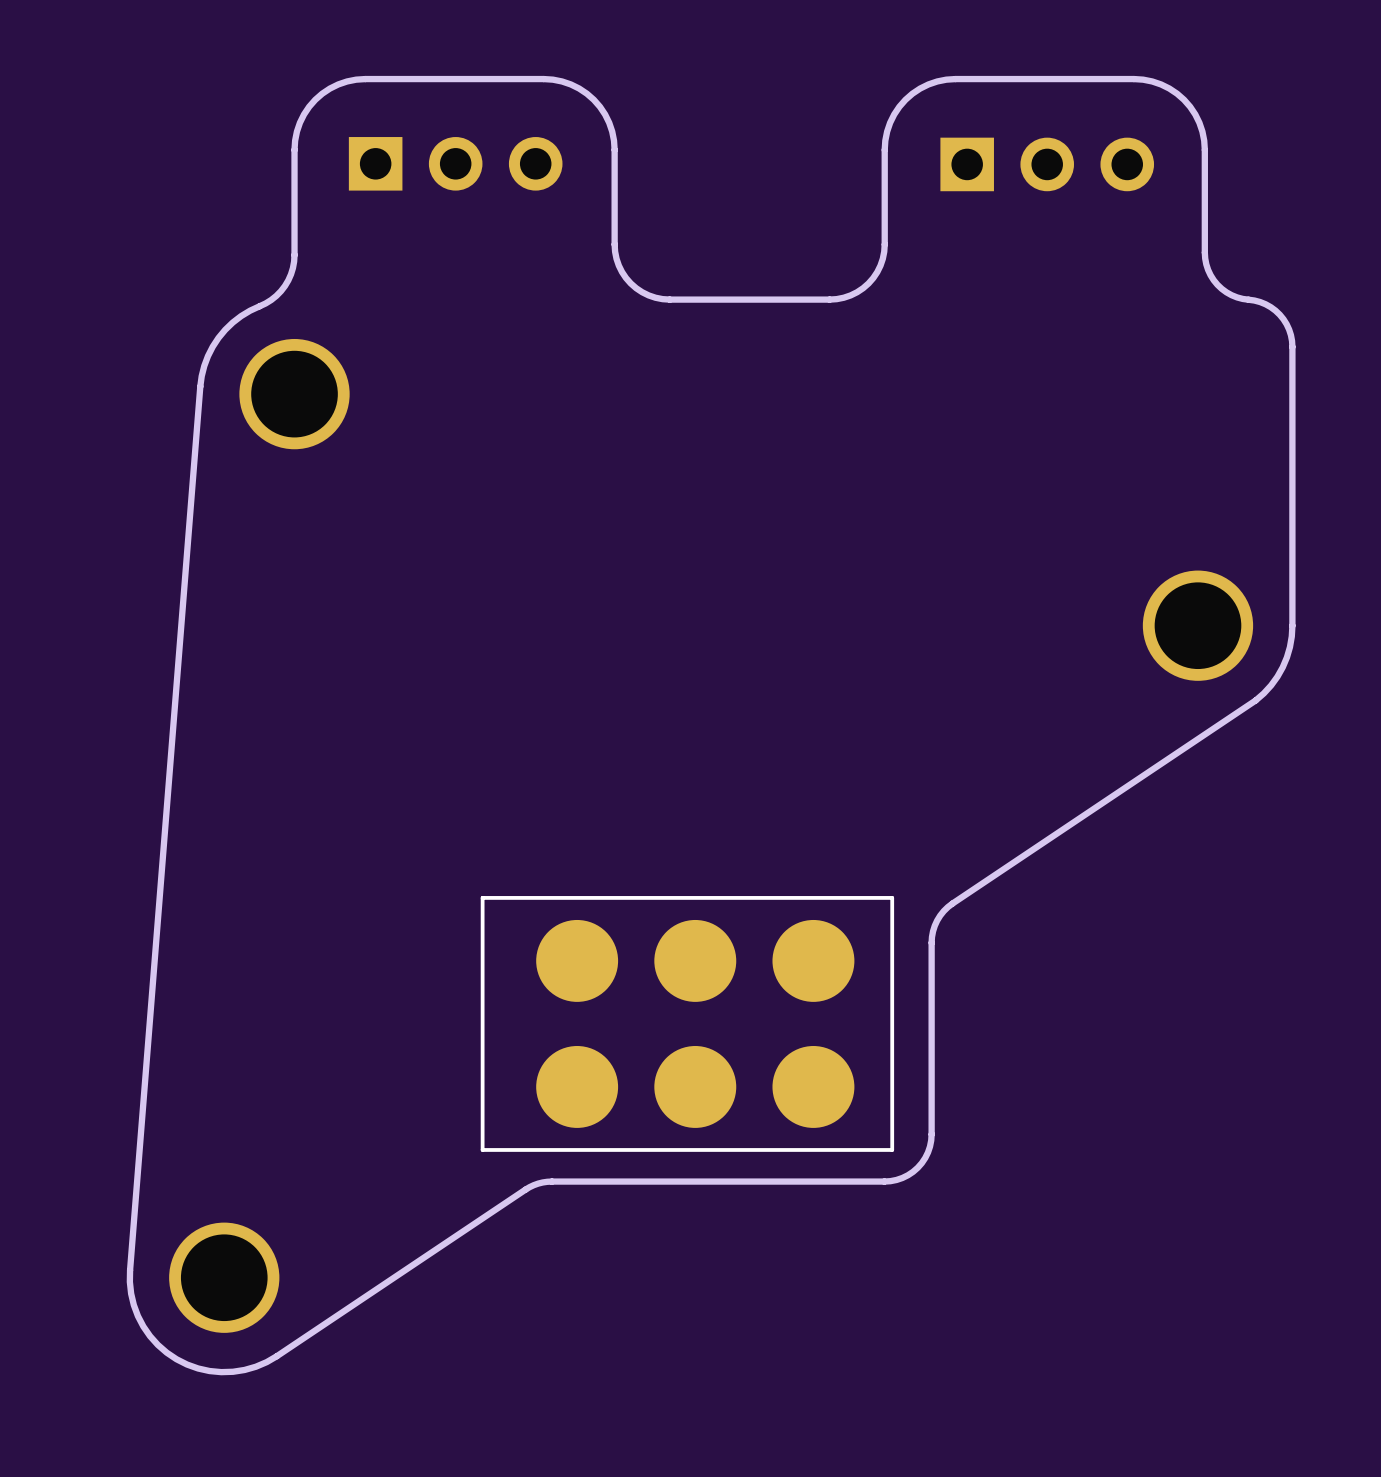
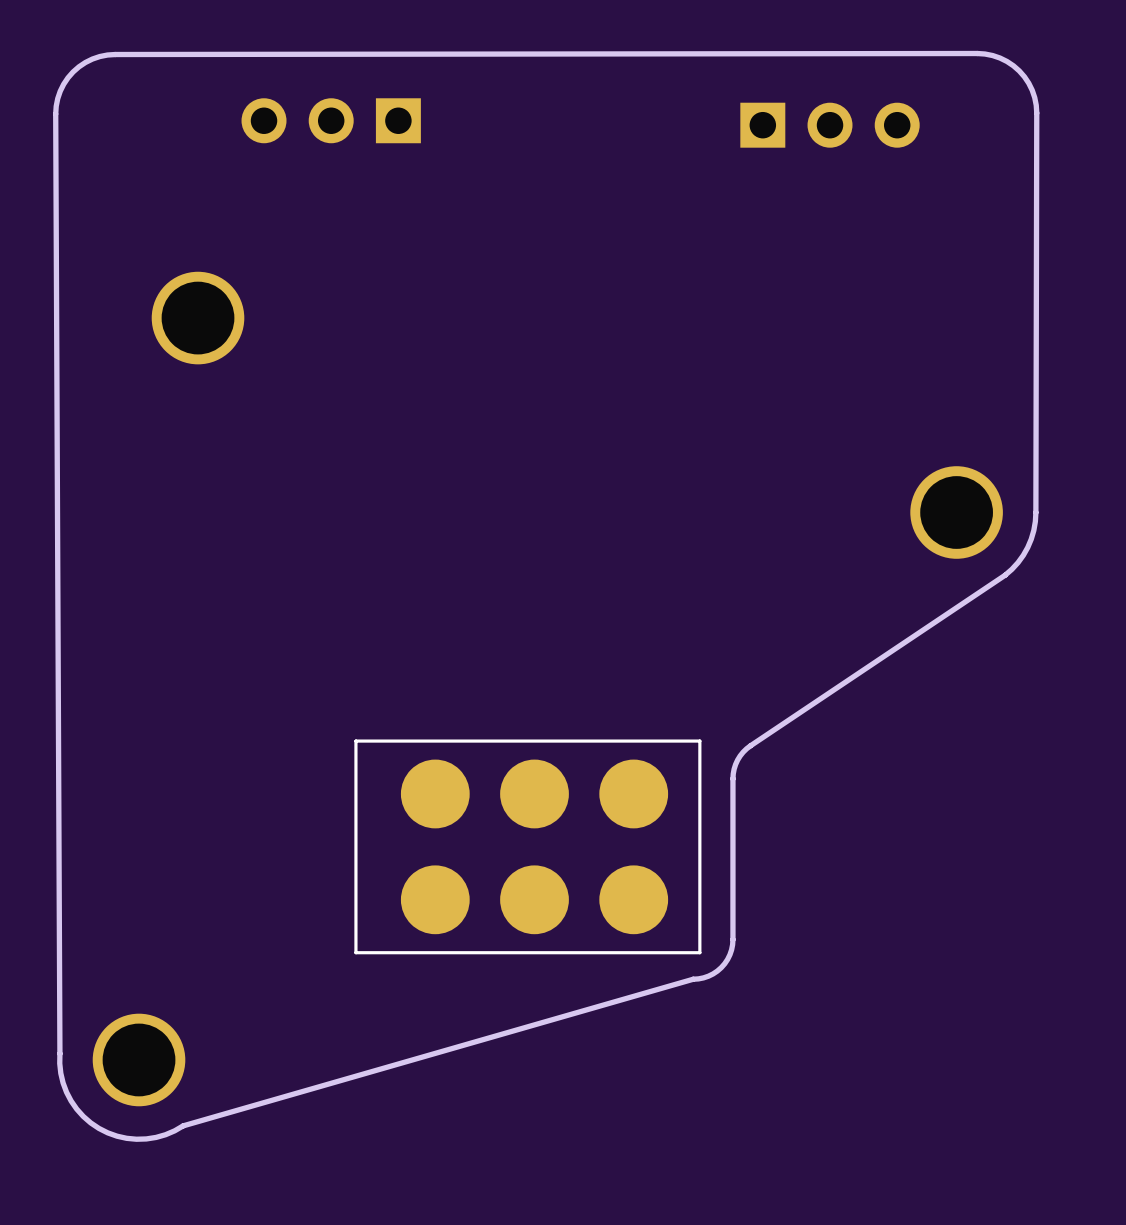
part rotation: 0° (455, 163) -> 180° (331, 120)
board edge: (1292, 625) (1290, 335) (1283, 319) (1275, 310) (1260, 302) (1231, 295) (1221, 288) (1210, 275) (1204, 252) (1204, 149) (1202, 131) (1190, 106) (1169, 88) (1152, 81) (1133, 79) (955, 79) (937, 81) (920, 88) (899, 106) (887, 131) (884, 149) (884, 244) (880, 265) (873, 278) (863, 288) (843, 297) (829, 299) (669, 299) (655, 297) (636, 288) (622, 272) (615, 251) (614, 149) (612, 131) (605, 114) (593, 99) (570, 84) (543, 79) (365, 79) (347, 81) (329, 88) (309, 106) (296, 131) (294, 149) (294, 254) (292, 268) (288, 280) (280, 291) (271, 299) (241, 316) (225, 329) (207, 356) (201, 376) (130, 1270) -> (1035, 512) (1036, 105) (1032, 90) (1024, 76) (1013, 65) (1000, 58) (977, 53) (115, 54) (99, 56) (85, 62) (73, 71) (63, 84) (57, 98) (55, 114) (59, 1053)
board edge: (884, 1181) (551, 1181) (538, 1183) (525, 1189) (276, 1356) -> (693, 979) (183, 1125)

